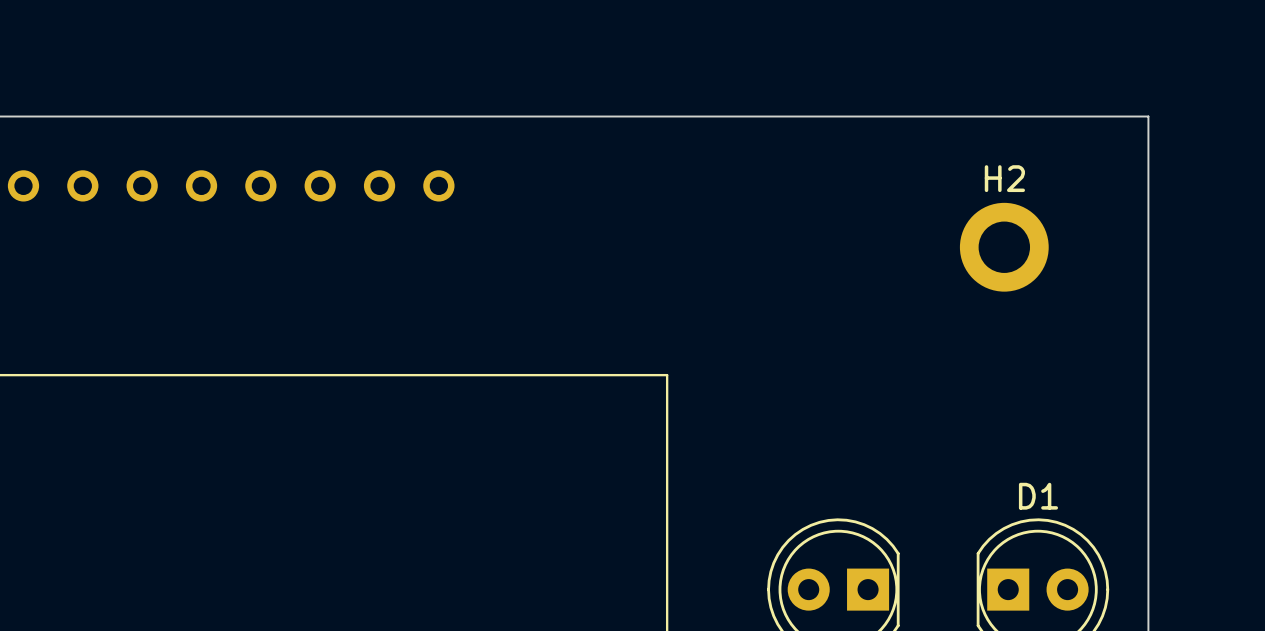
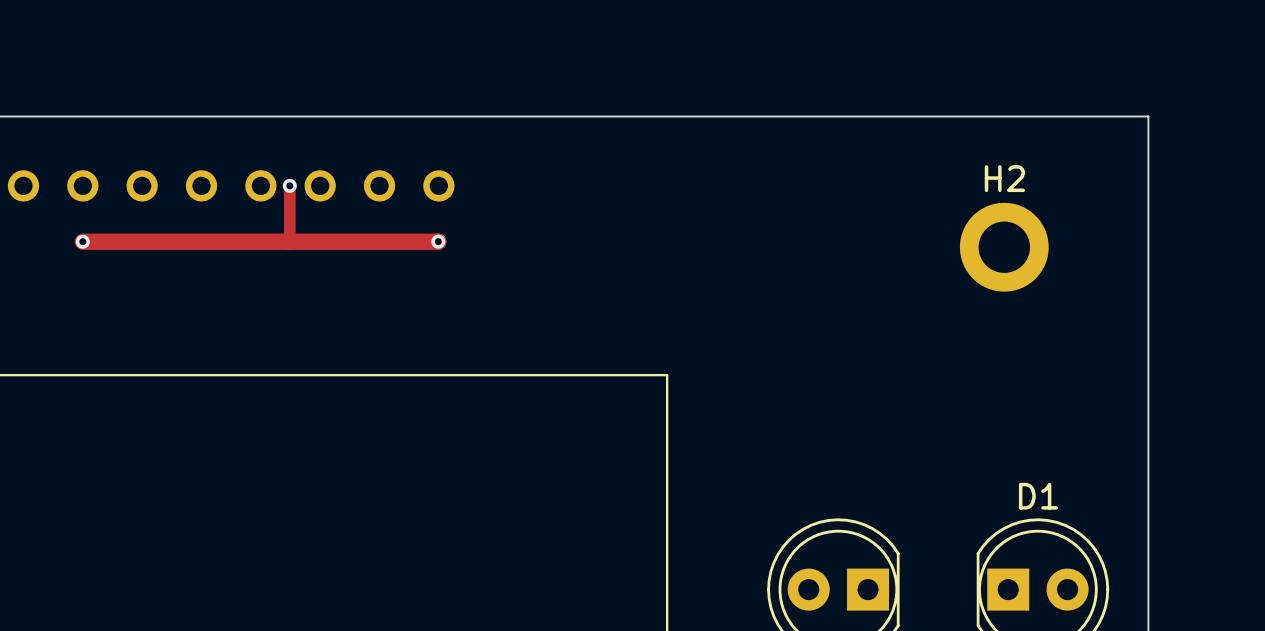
track: none -> (289, 185) (289, 241)
via: none -> (289, 185)
track: none -> (82, 241) (438, 241)
via: none -> (82, 241)
via: none -> (438, 241)

